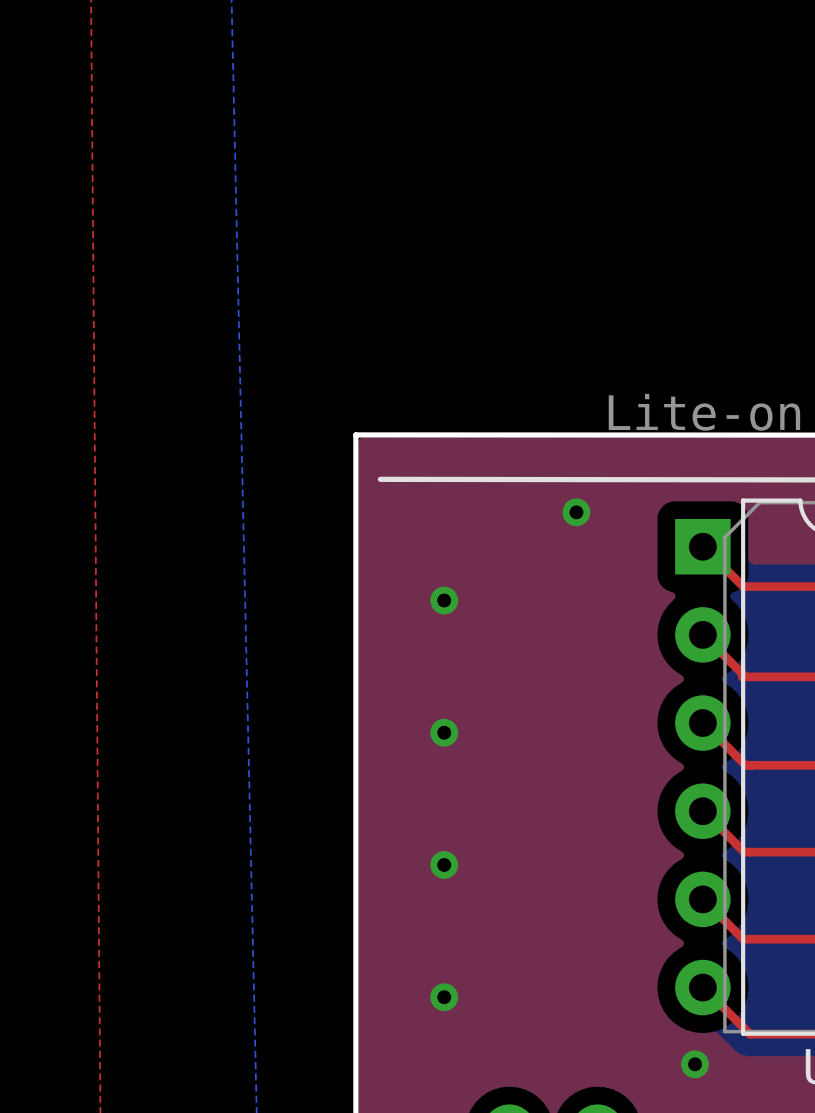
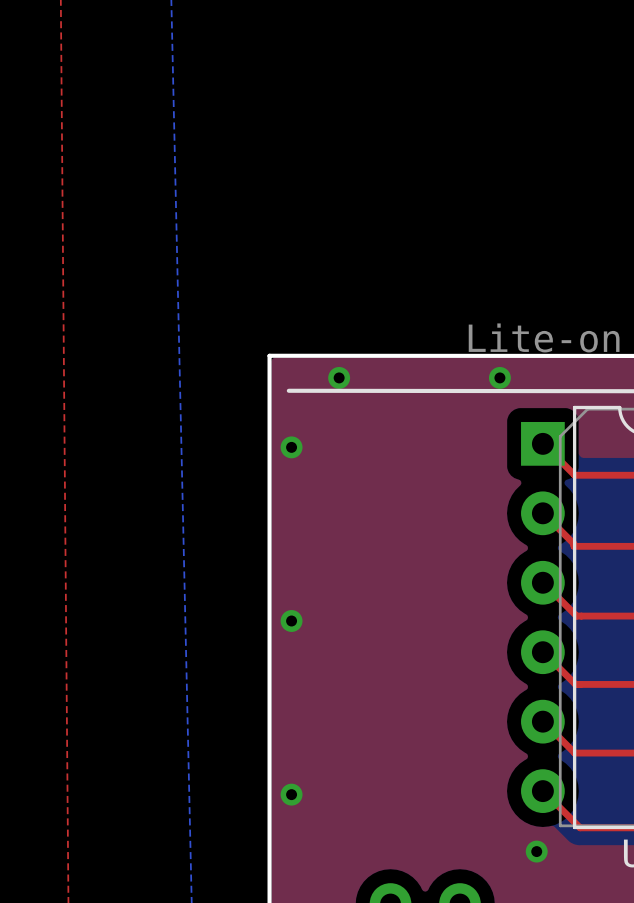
via: none -> (339, 377)
via: none -> (499, 377)
via: (576, 512) -> none
via: none -> (291, 447)
via: (444, 600) -> none
via: (444, 732) -> none
via: none -> (291, 621)
via: (444, 864) -> none
via position: (444, 997) -> (291, 794)

